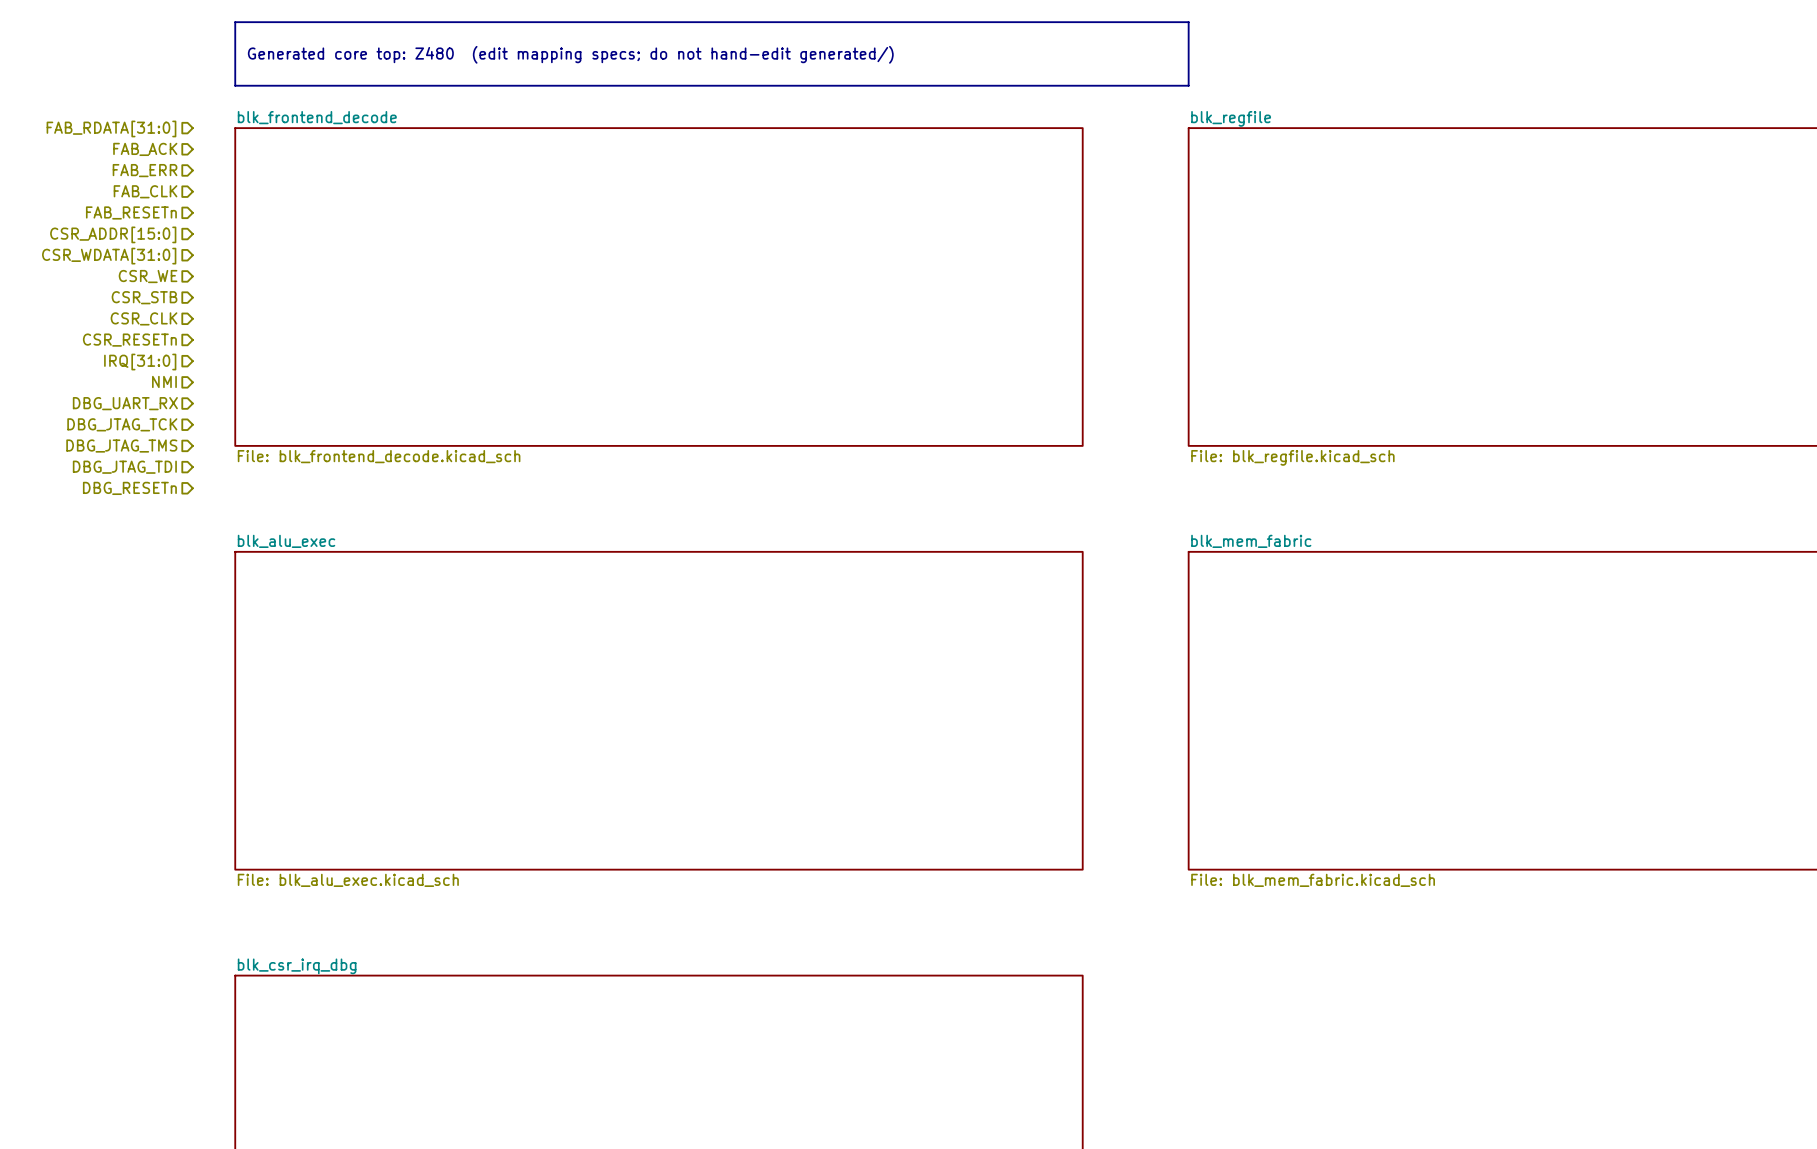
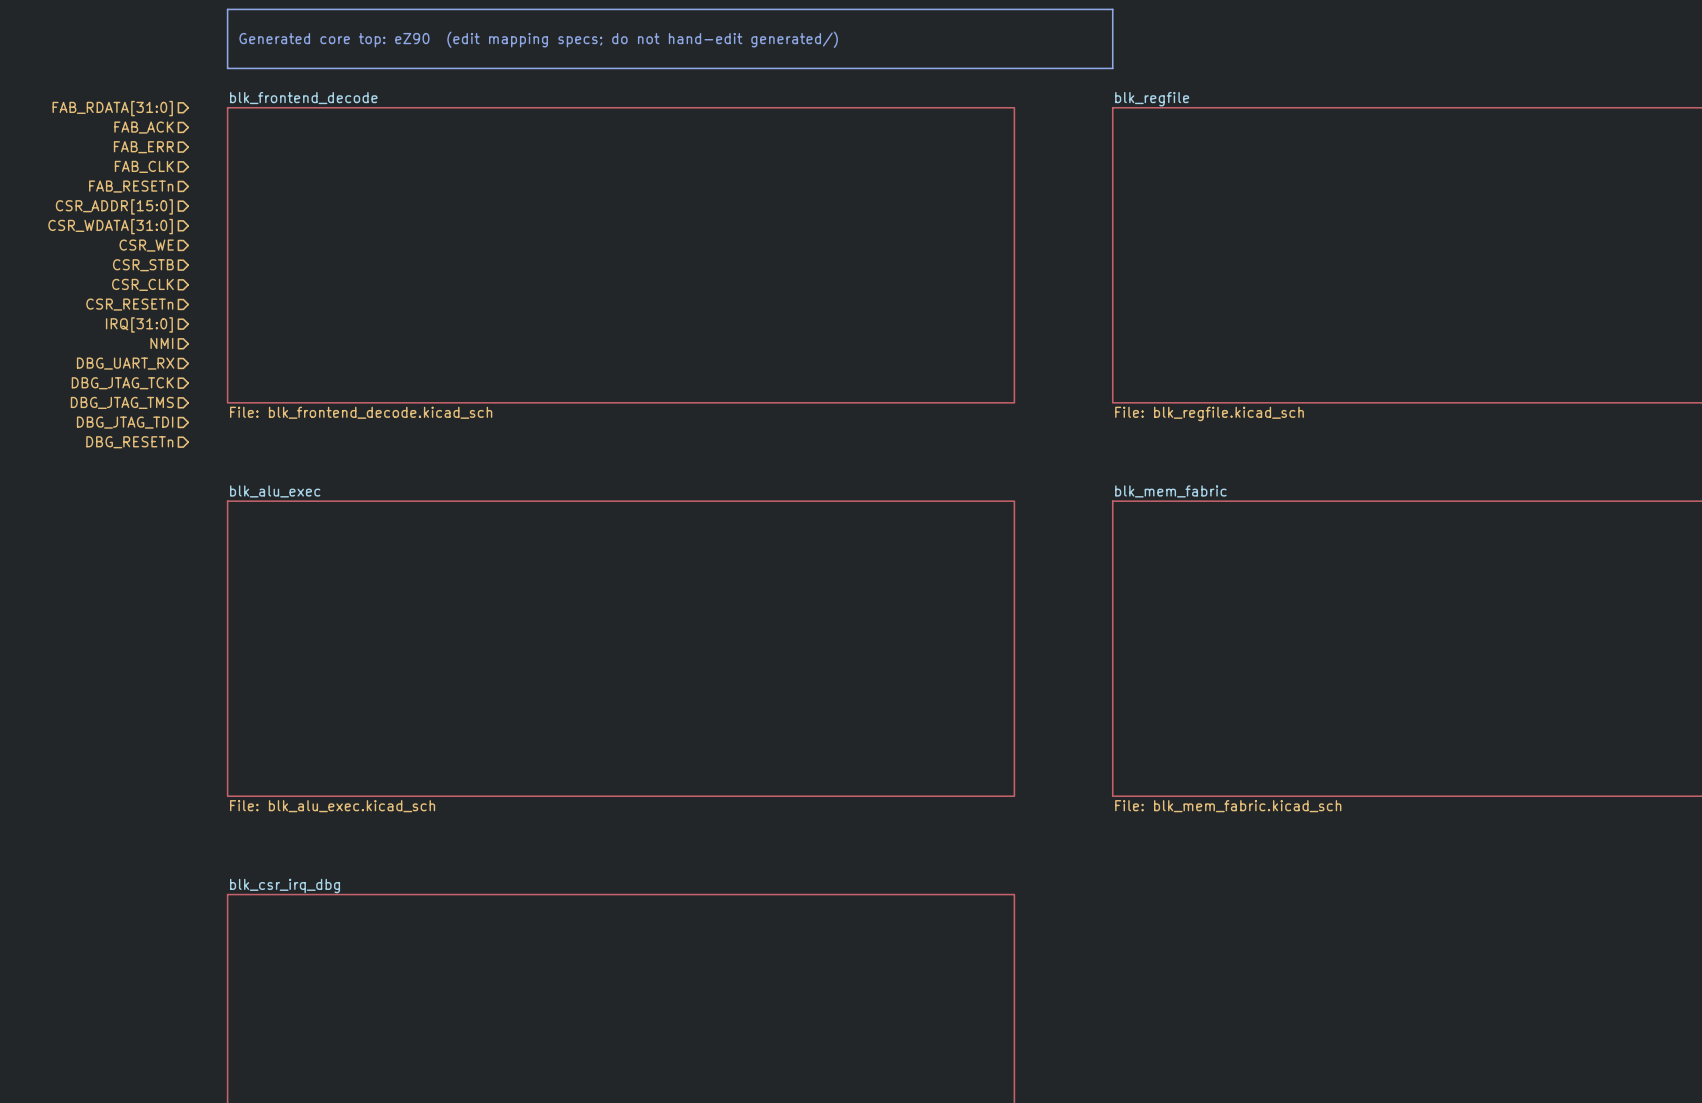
text: Generated core top: Z480 (edit mapping specs; do not hand-edit generated/) (570, 54) -> Generated core top: eZ90 (edit mapping specs; do not hand-edit generated/) (538, 39)

